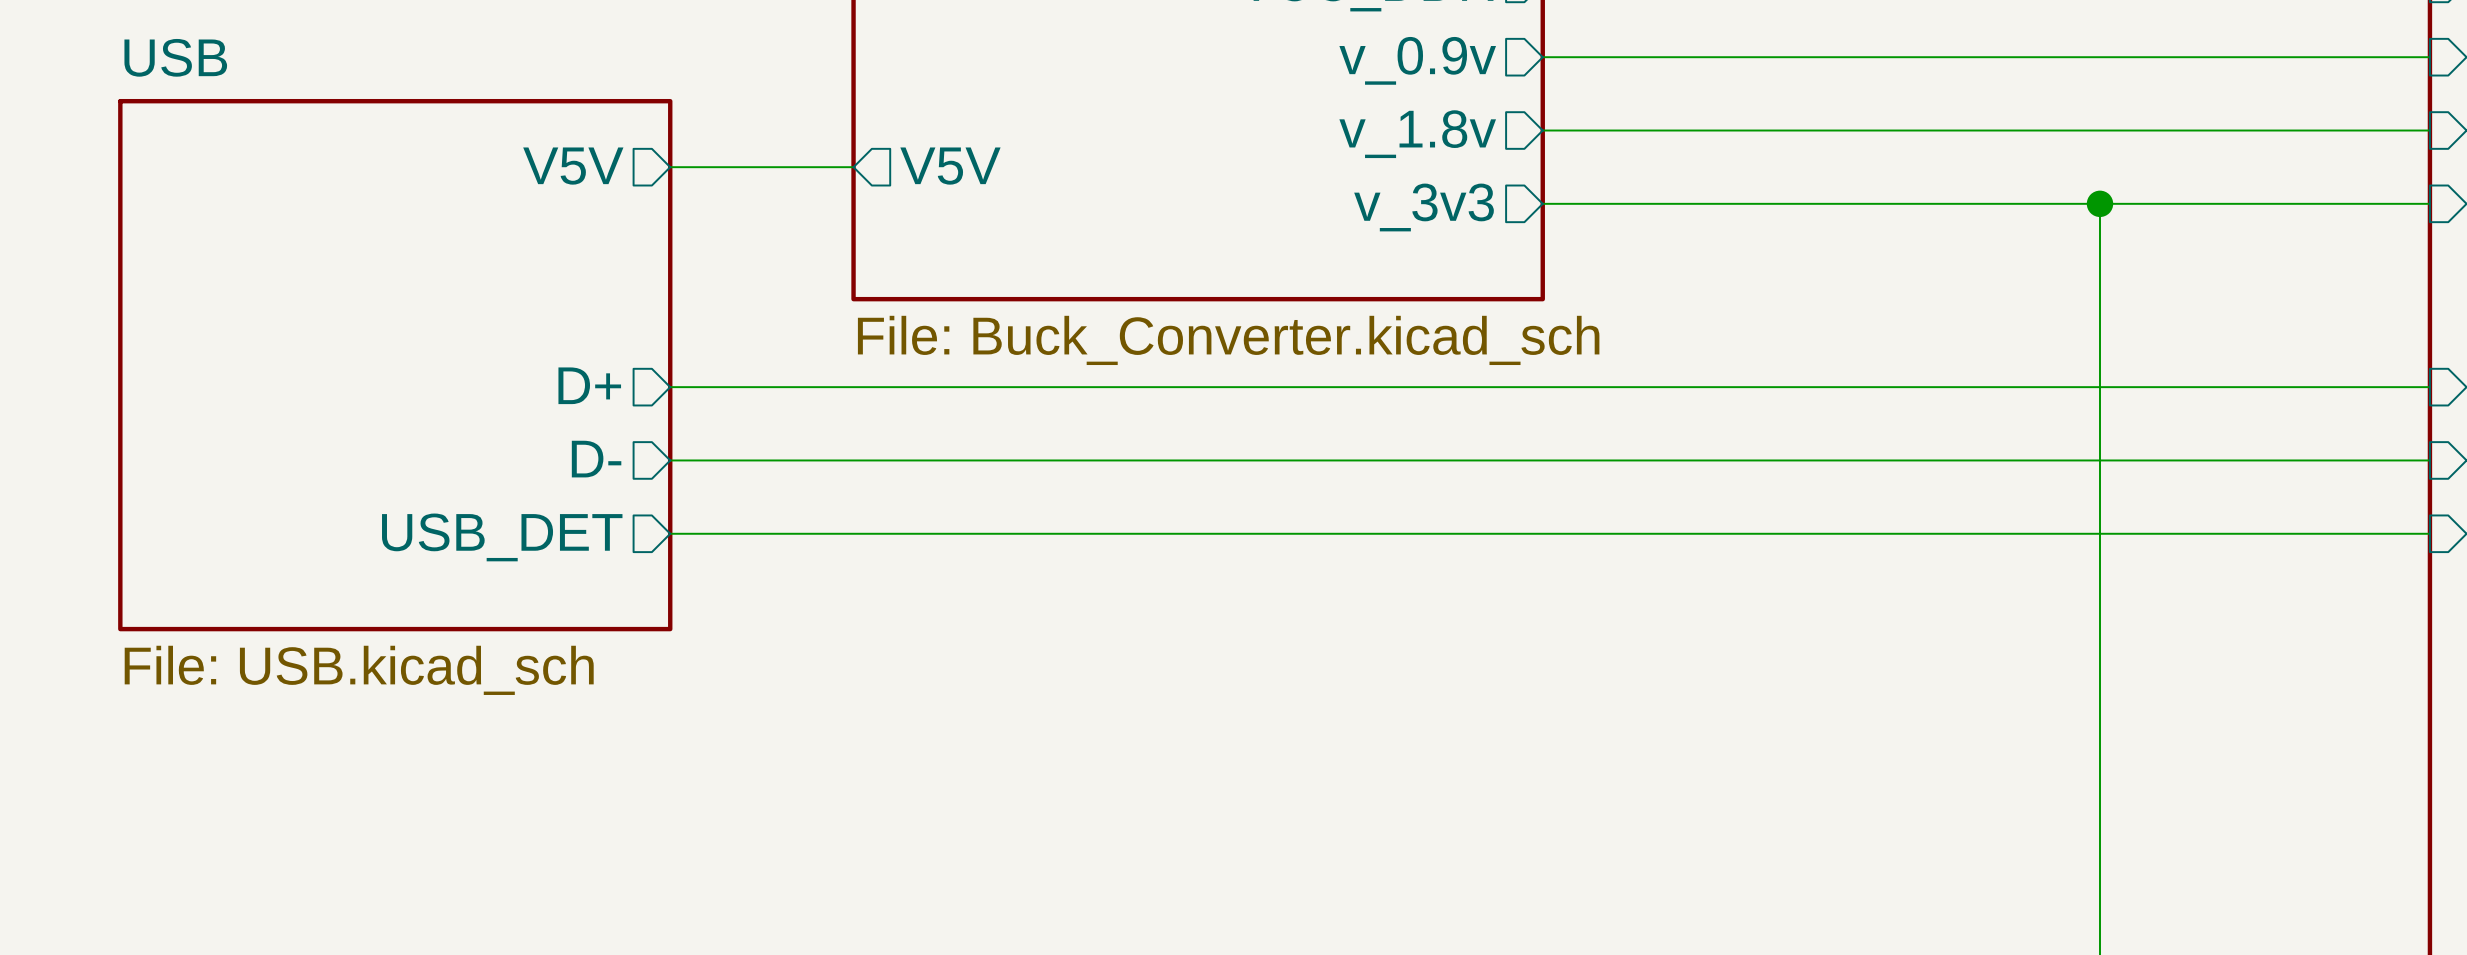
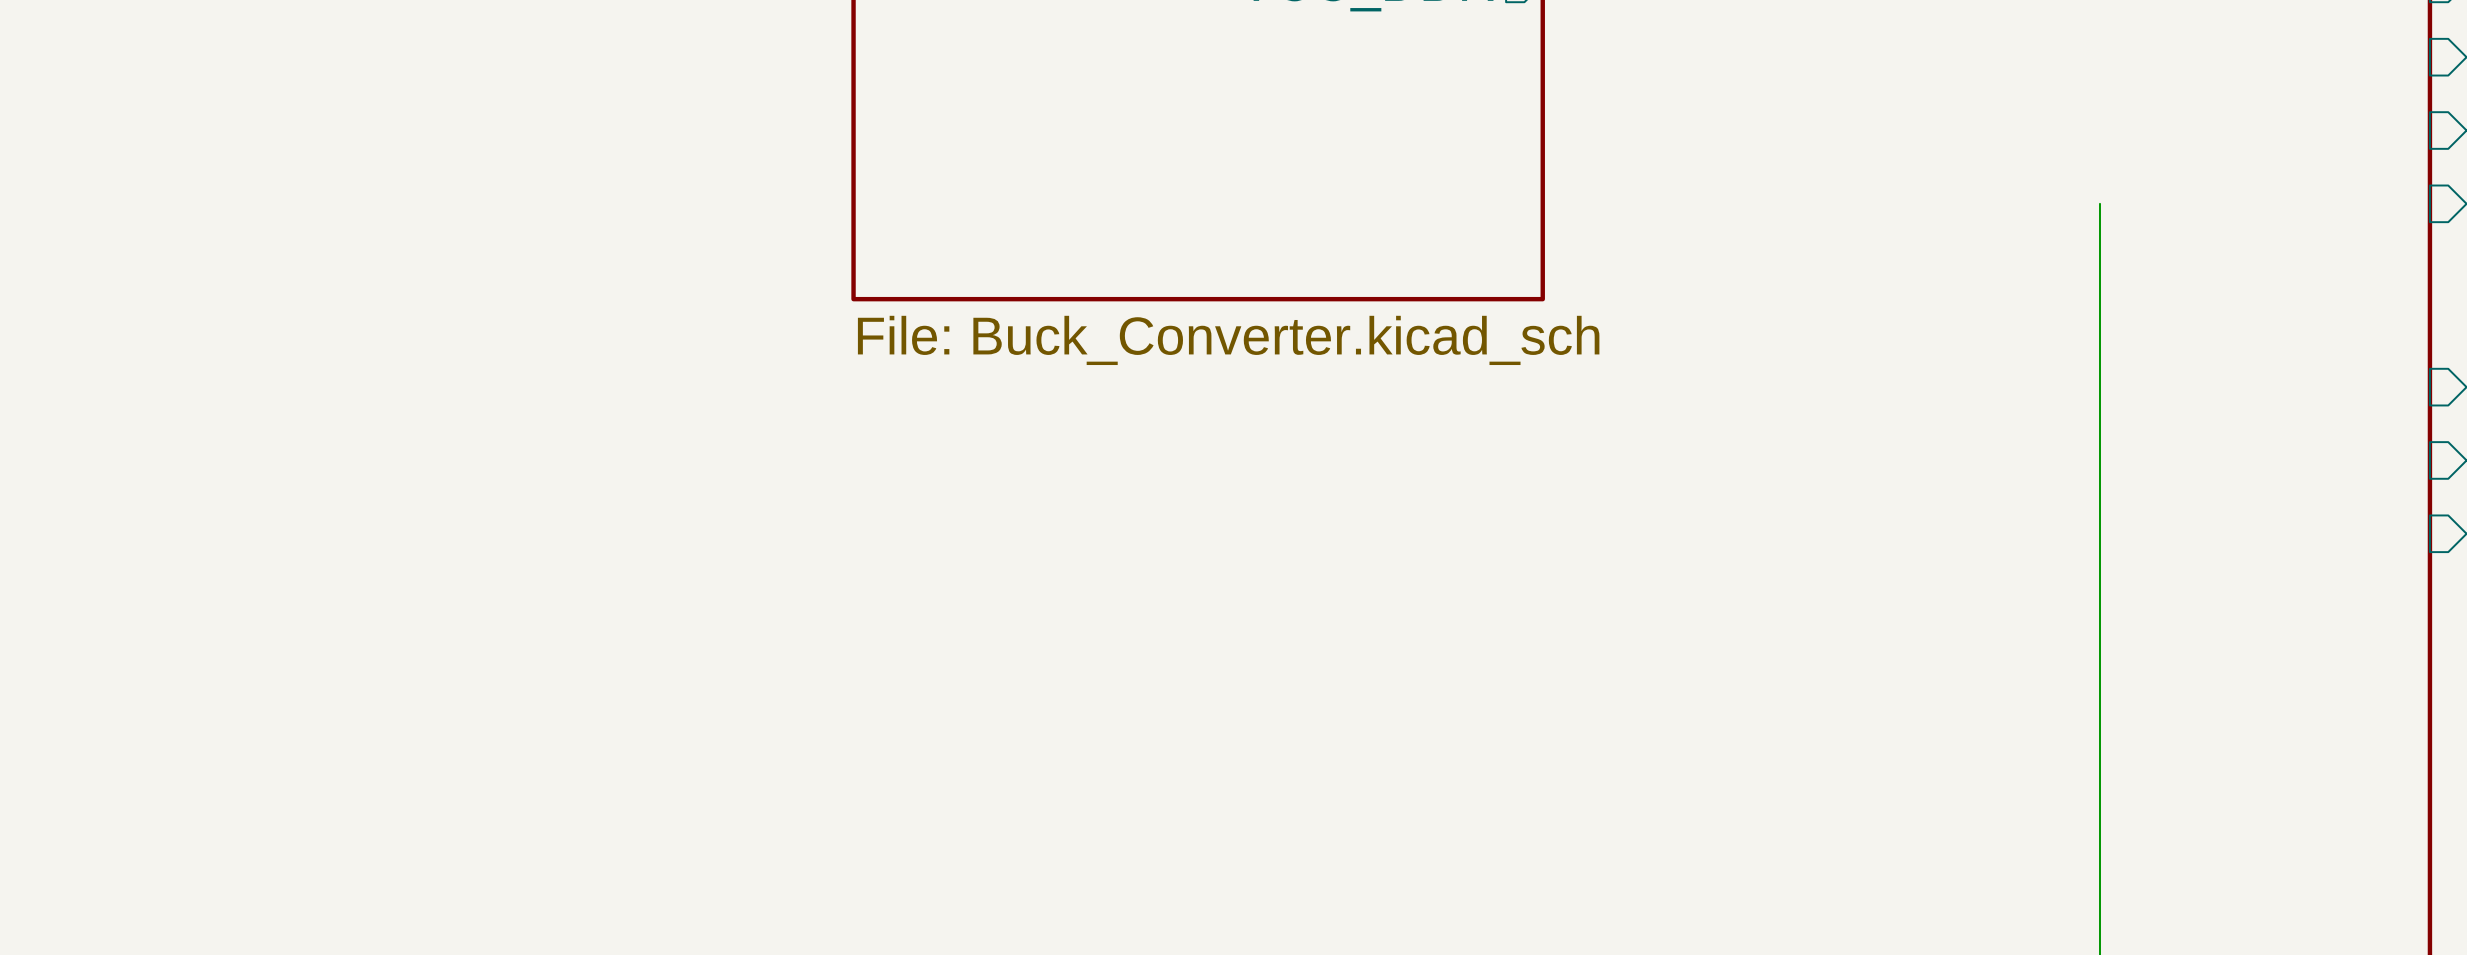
wire: (1542, 57) (2429, 57) -> none
sheet pin: v_0.9v (1417, 60) -> none
wire: (1542, 130) (2429, 130) -> none
sheet pin: v_1.8v (1417, 134) -> none
sheet pin: V5V (573, 166) -> none
sheet pin: V5V (950, 166) -> none
wire: (670, 167) (853, 167) -> none
wire: (1542, 203) (2429, 203) -> none
junction: (2099, 203) -> none
sheet pin: v_3v3 (1424, 207) -> none
sheet USB: File: USB.kicad_sch (395, 365) -> none
sheet pin: D+ (589, 385) -> none
wire: (670, 387) (2429, 387) -> none
sheet pin: D- (596, 459) -> none
wire: (670, 460) (2429, 460) -> none
wire: (670, 533) (2429, 533) -> none
sheet pin: USB_DET (502, 537) -> none

